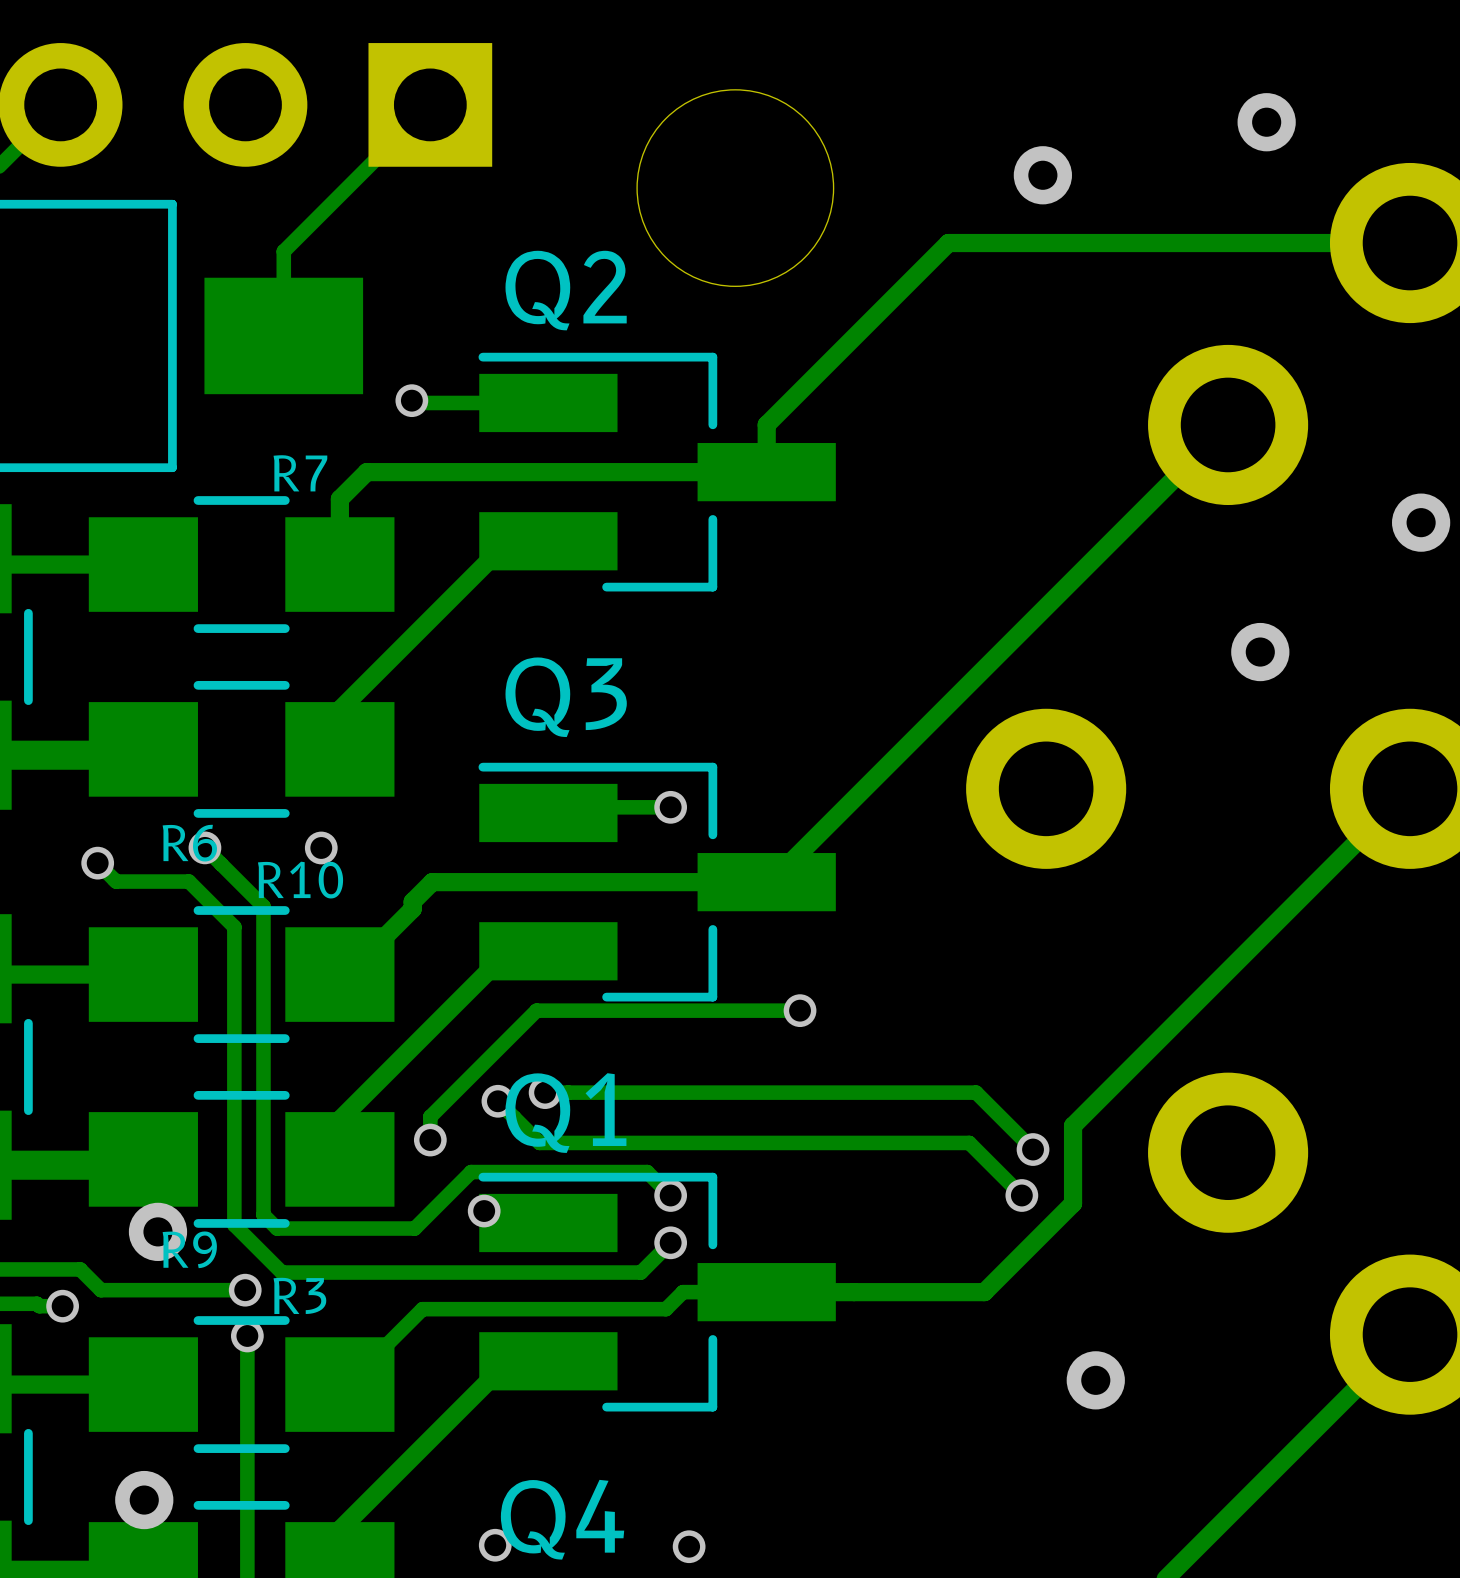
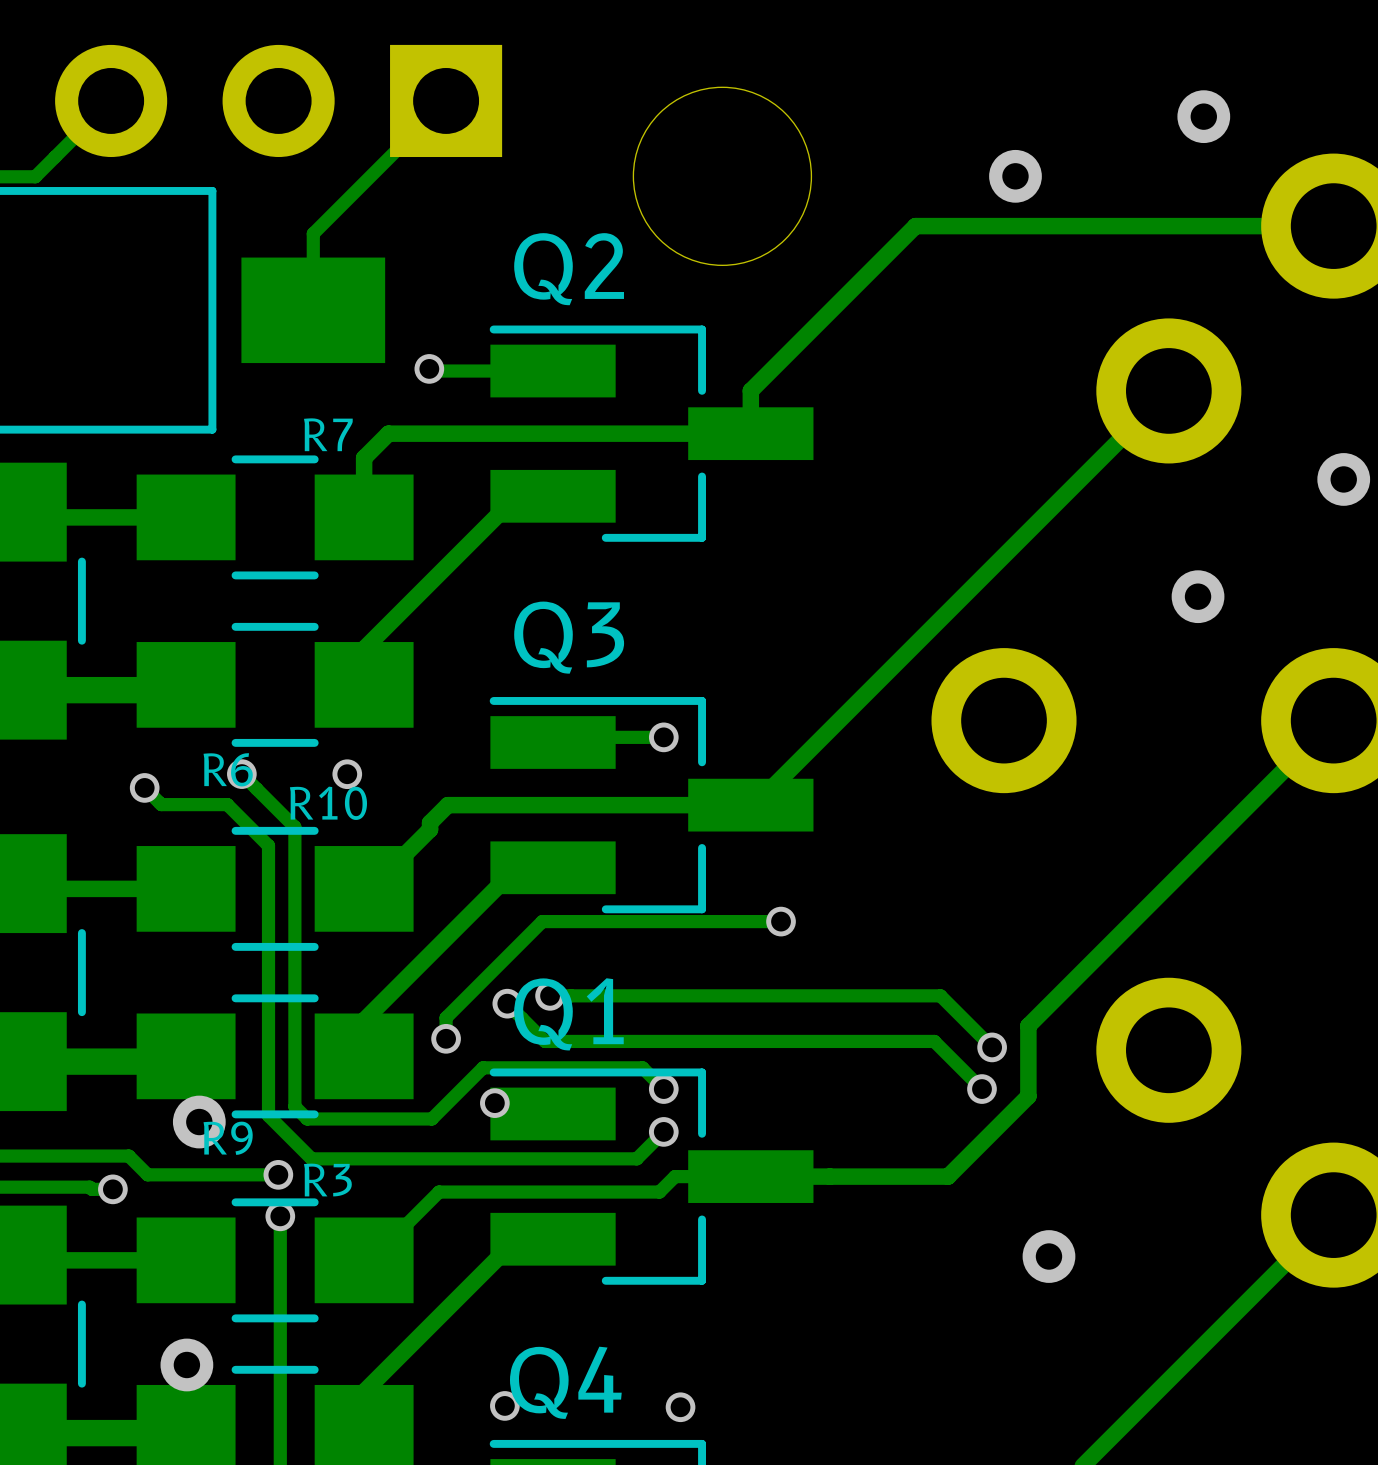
via position: (1042, 175) -> (1015, 176)

